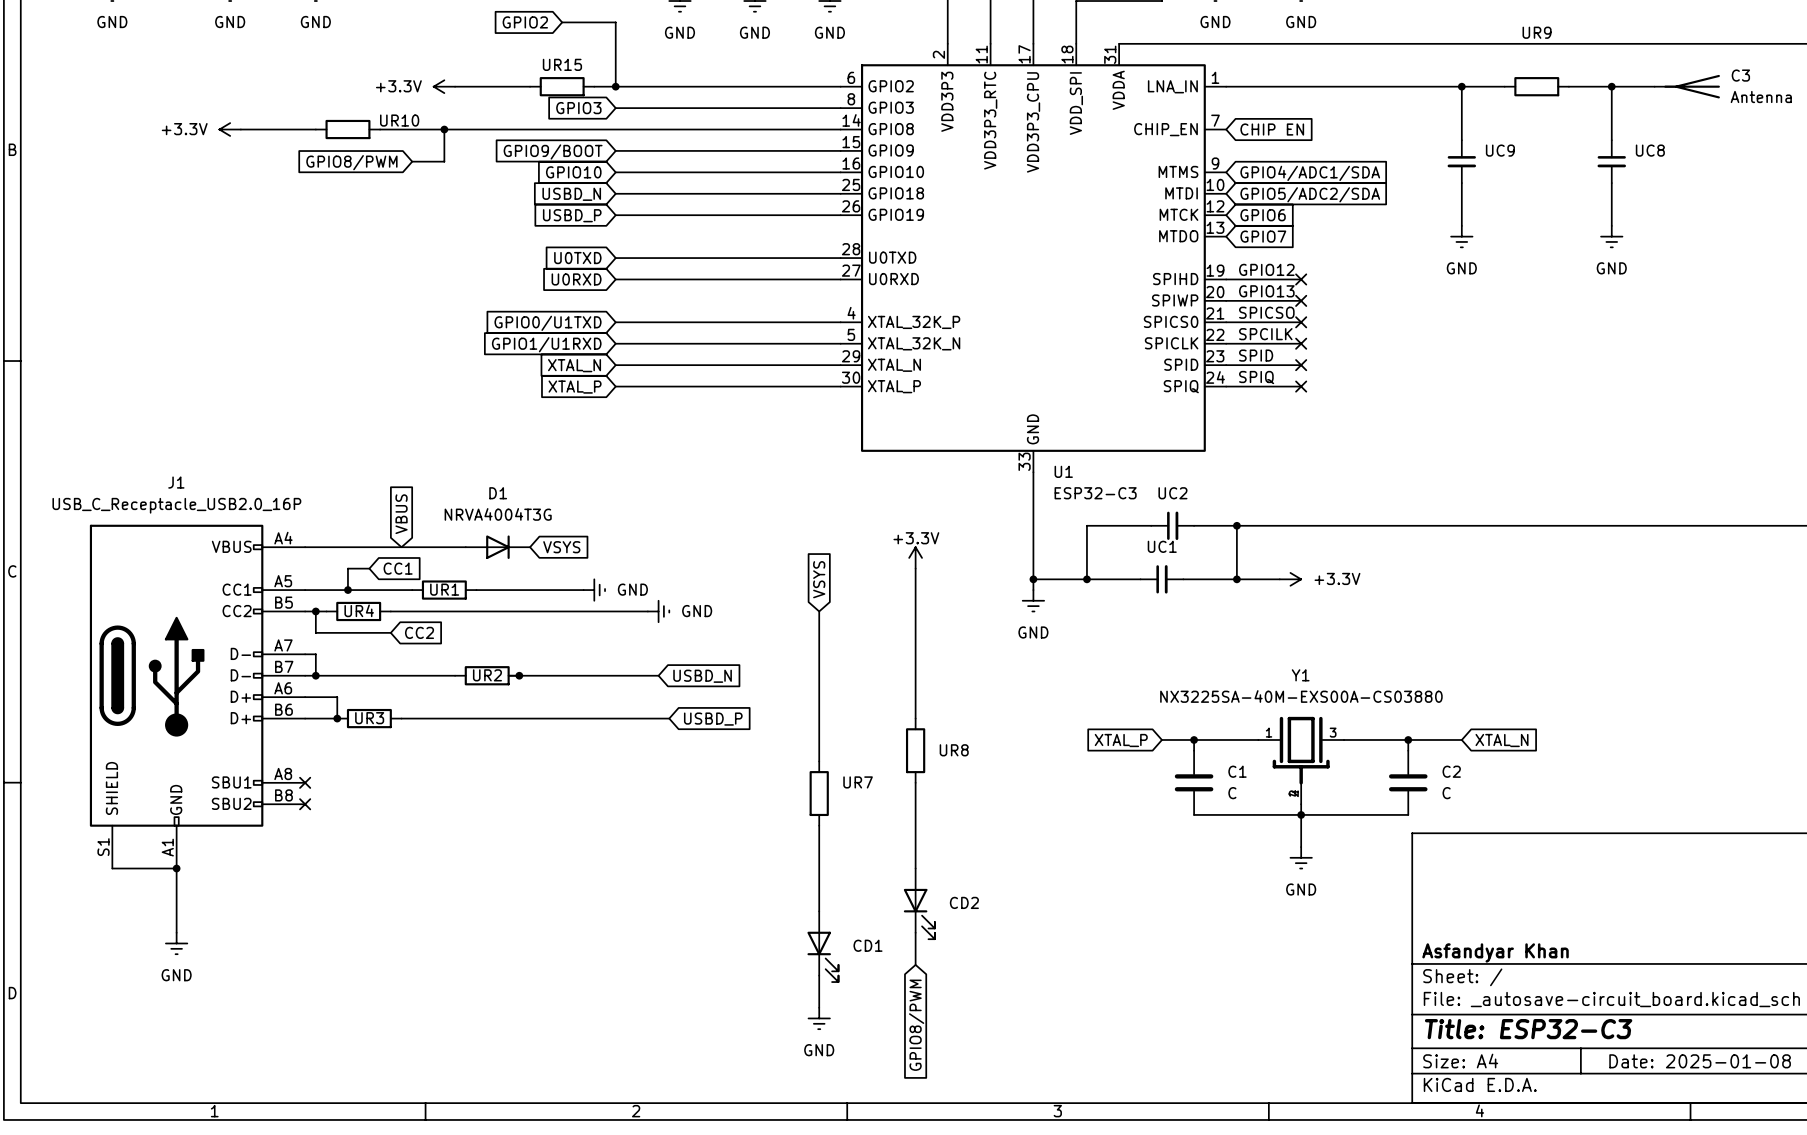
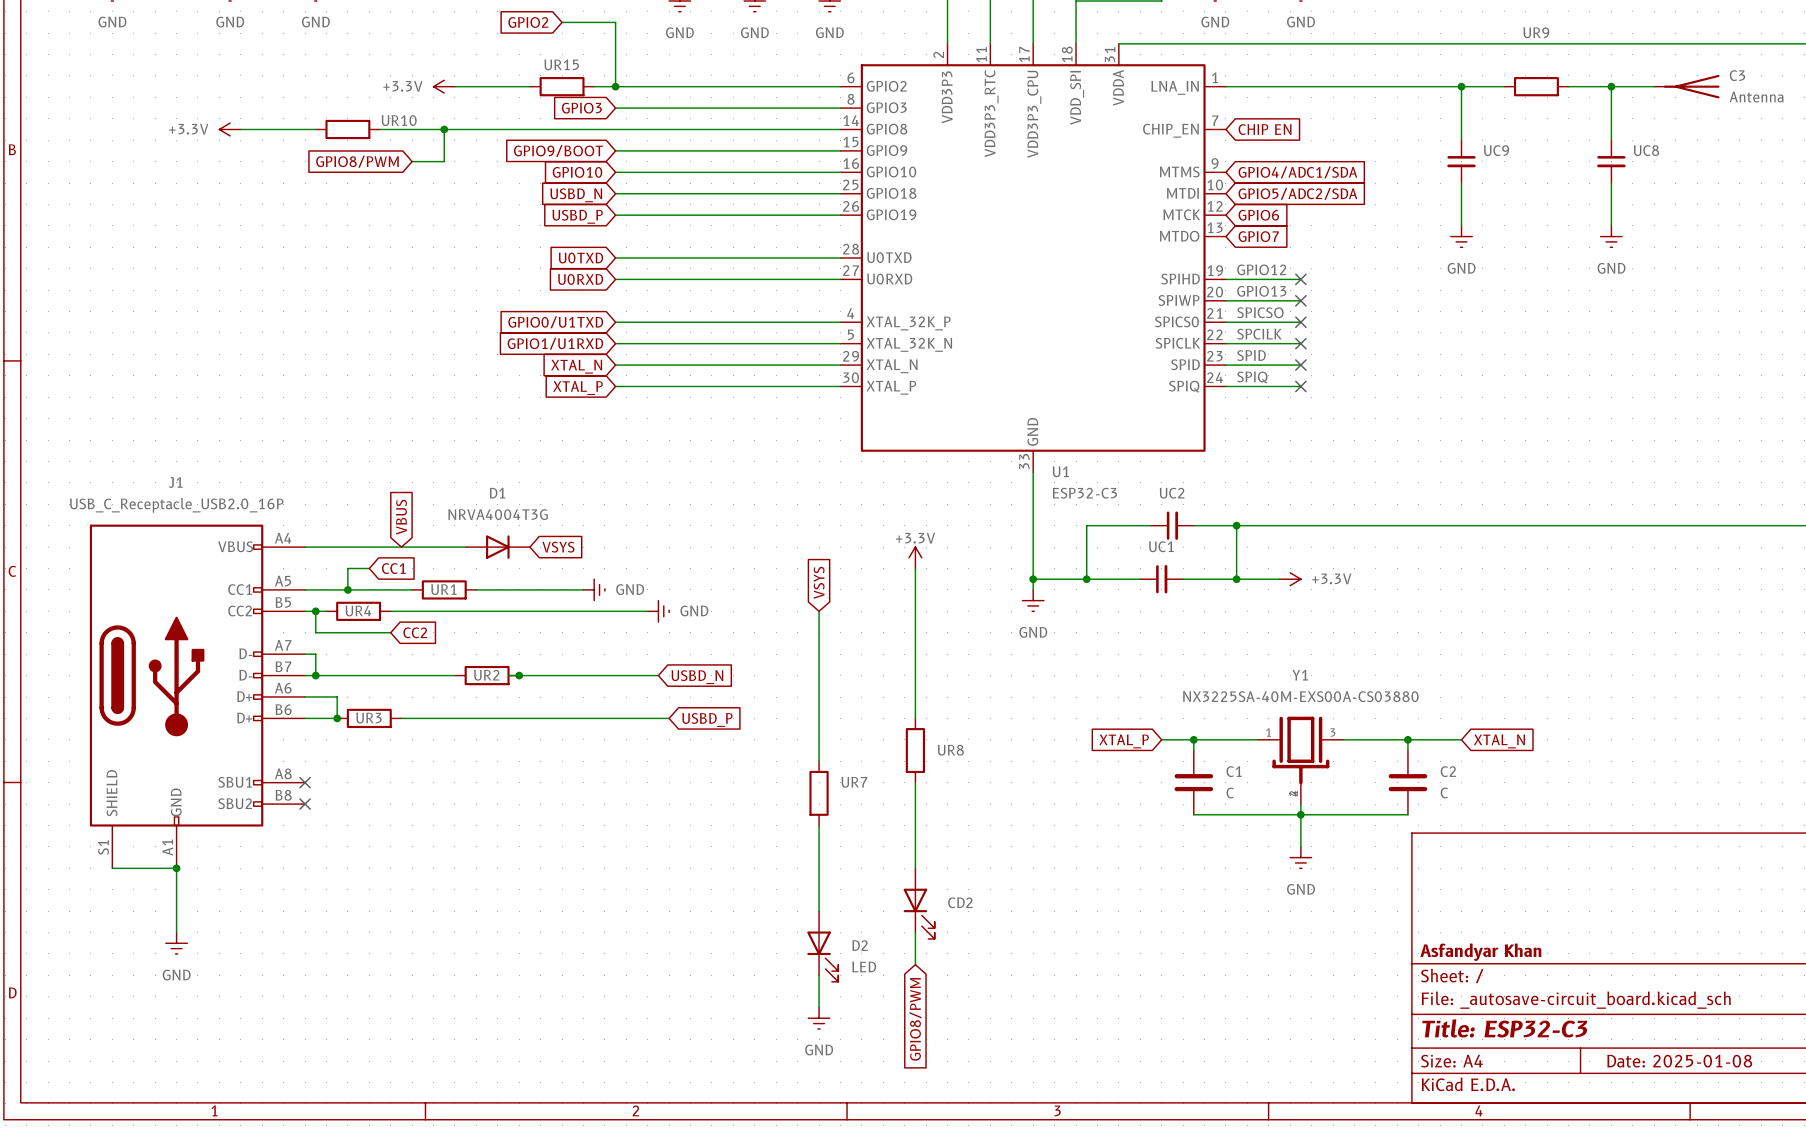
CD1 name: CD1 (868, 945) -> D2 (860, 945)
CD1 value: none -> LED (864, 966)

